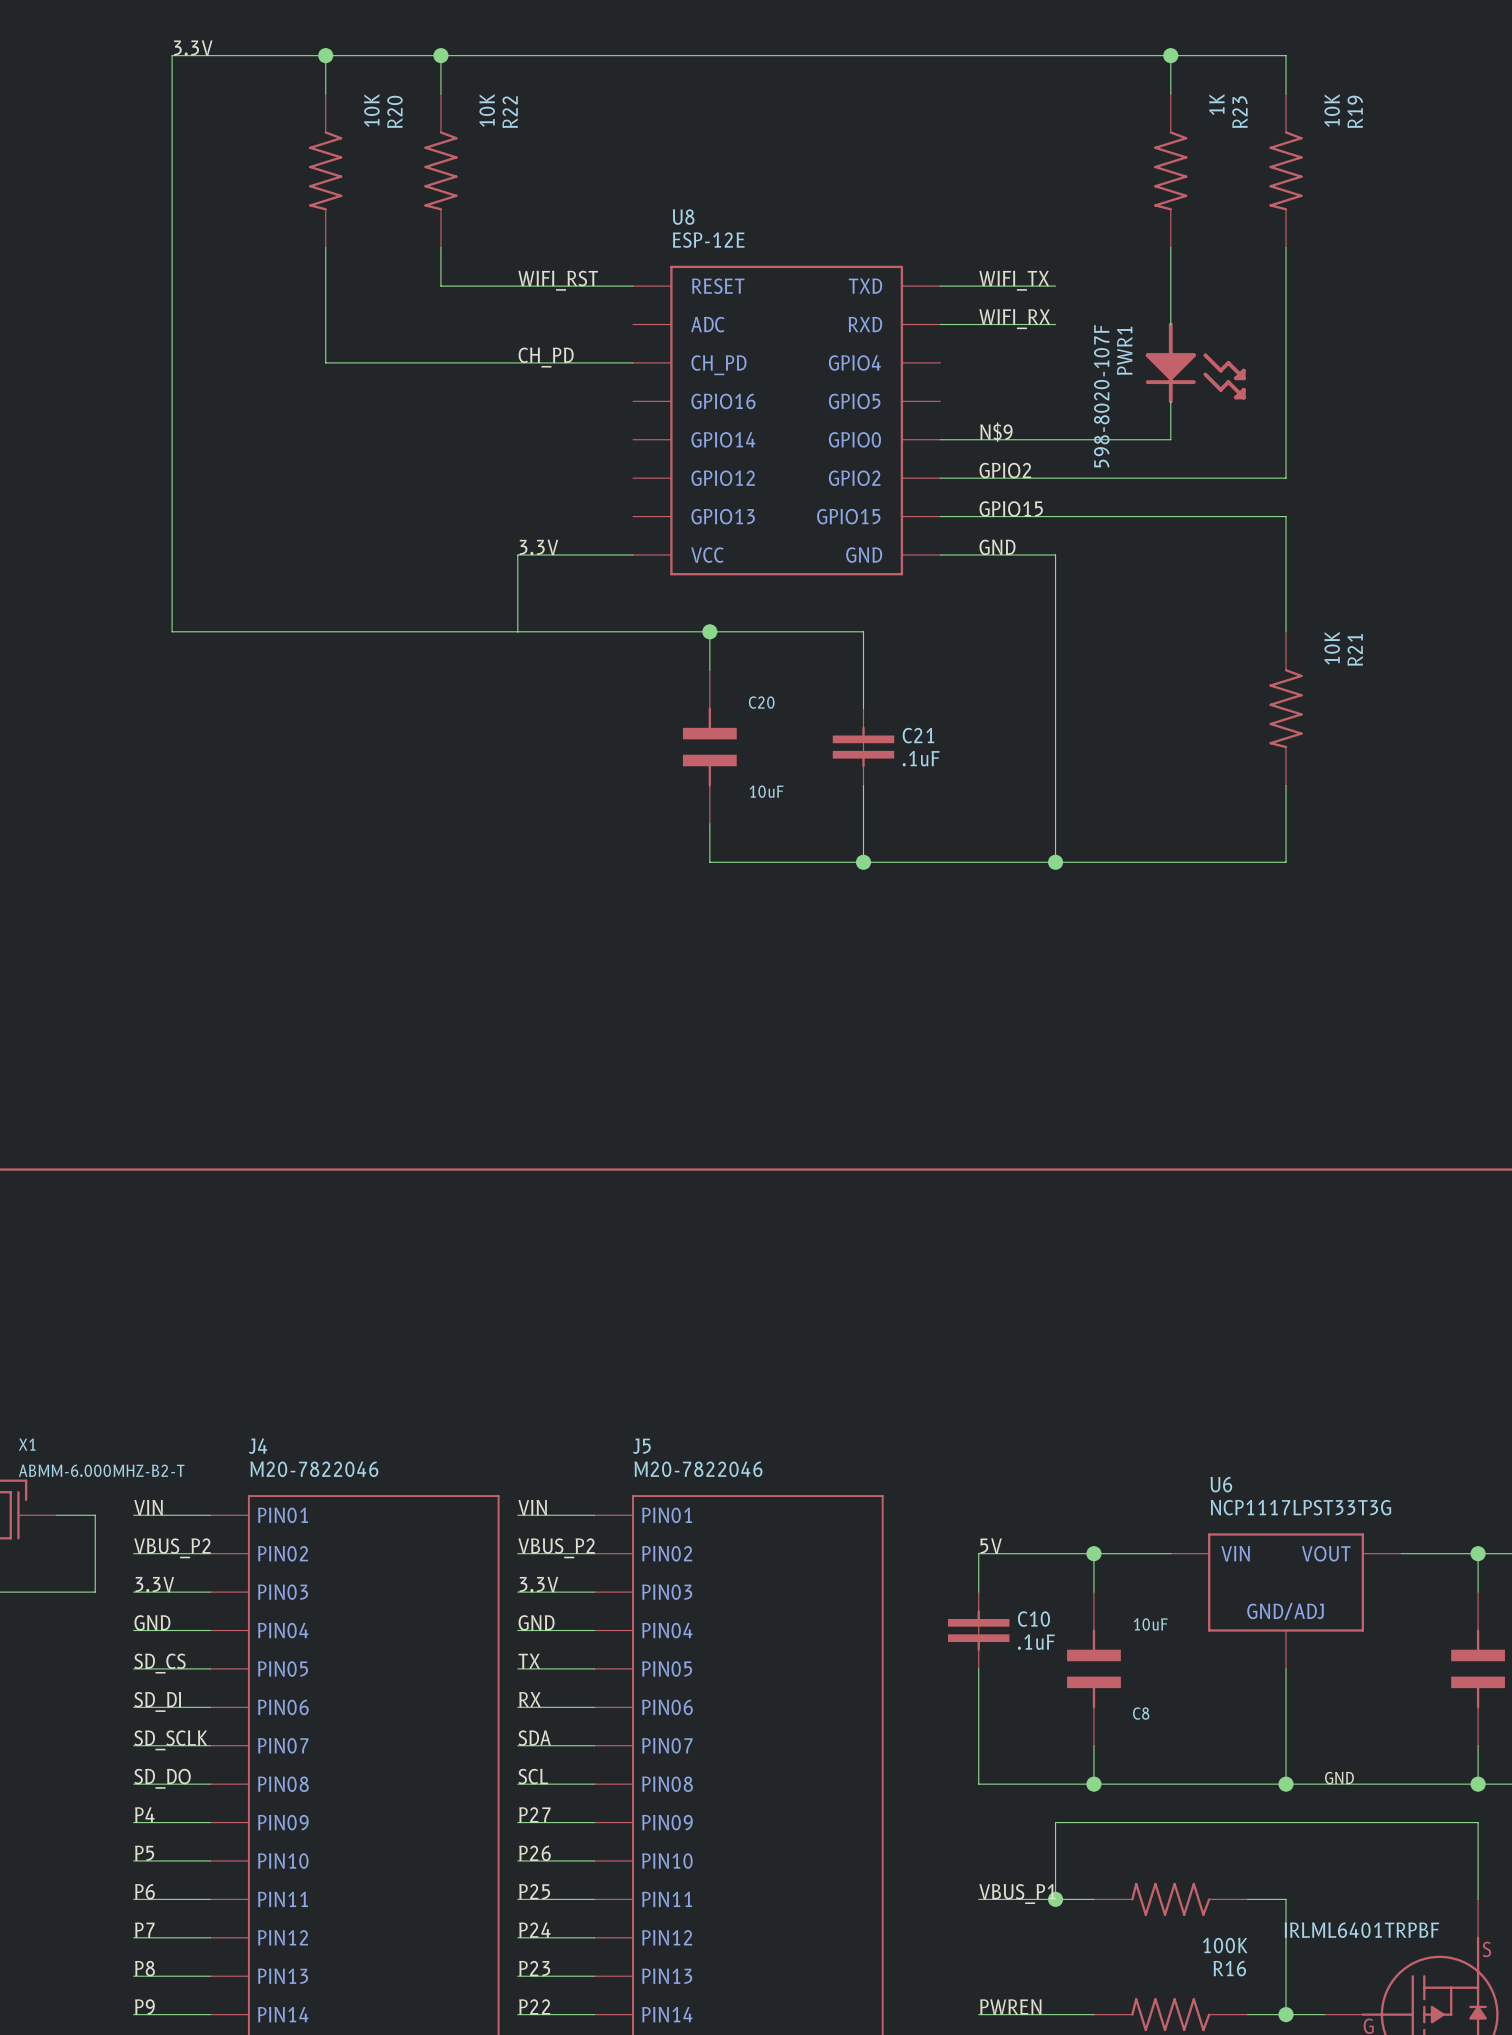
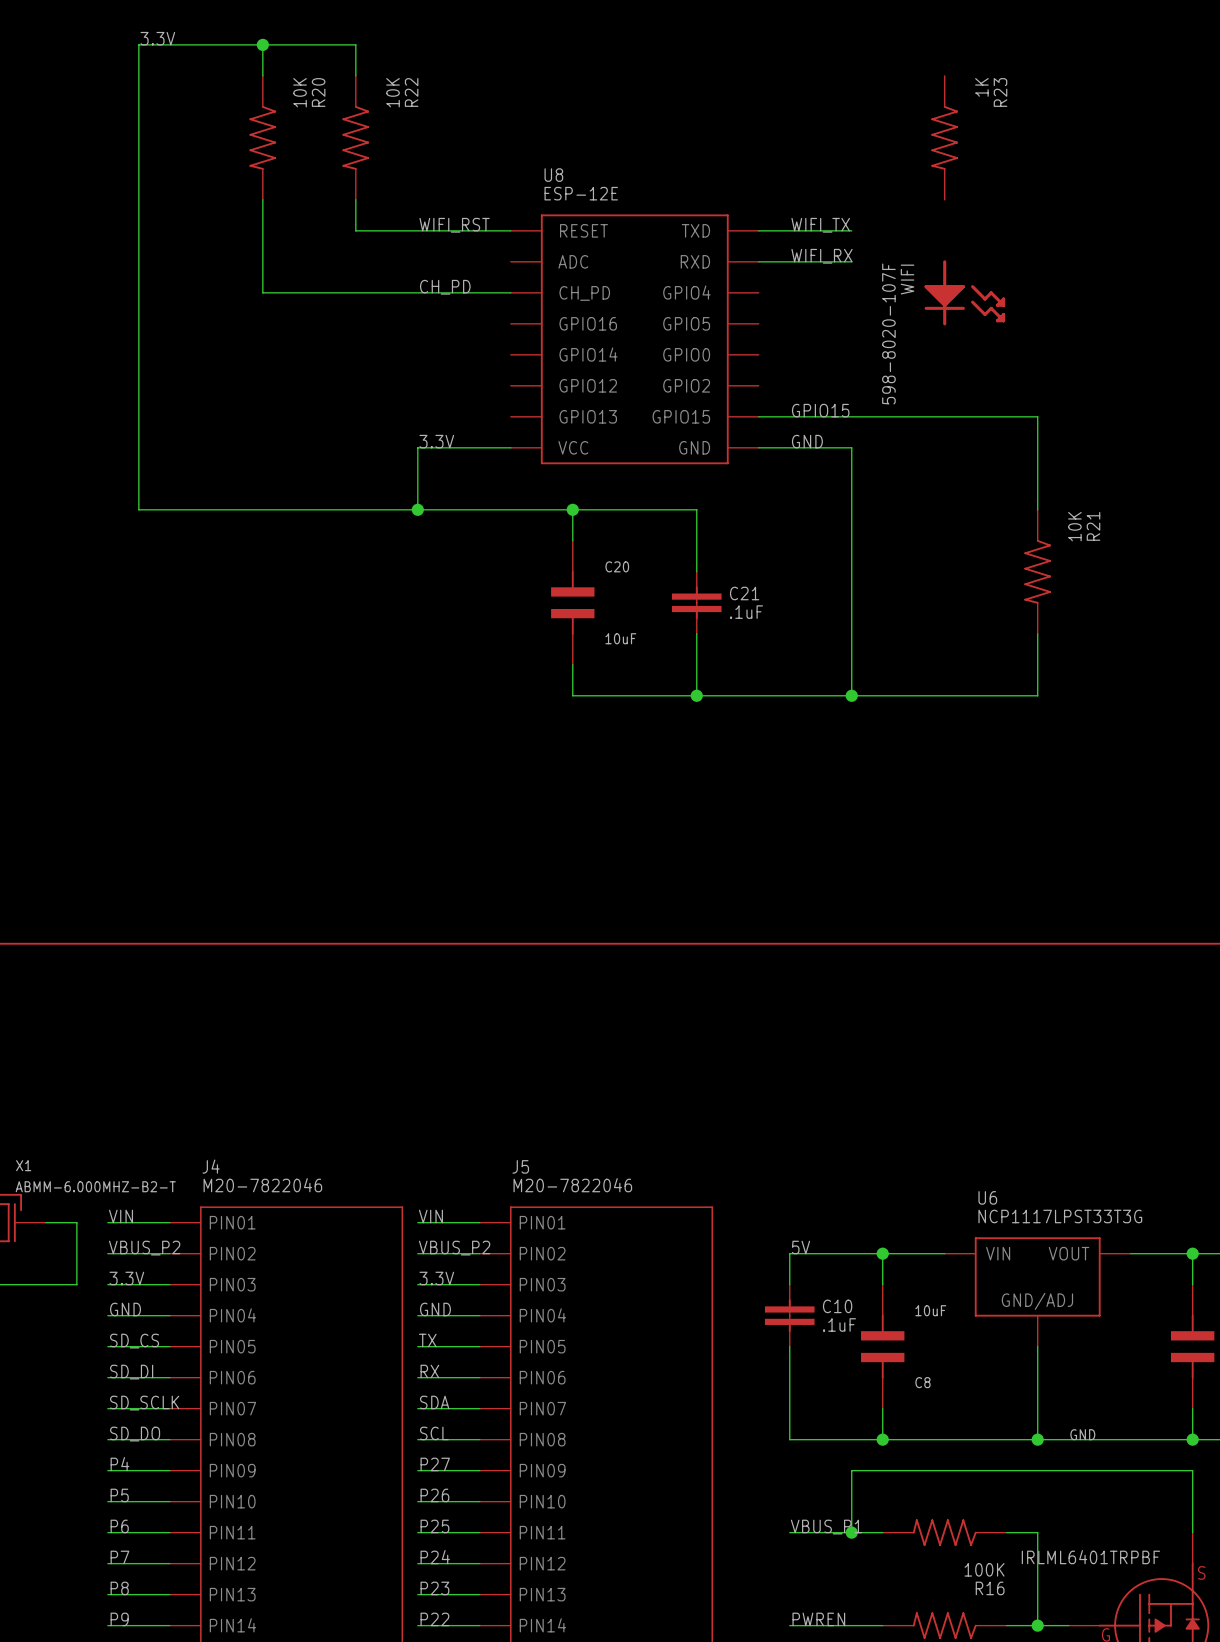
wire: (440, 55) (1286, 55) (1286, 94) -> none
junction: (440, 55) -> none
wire: (1170, 55) (1170, 94) -> none
junction: (1170, 55) -> none
R19: 10K (1286, 170) -> none
wire: (1170, 247) (1170, 324) -> none
wire: (1286, 247) (1286, 478) (940, 478) -> none
PWR1 name: PWR1 (1124, 350) -> WIFI (907, 279)
wire: (1170, 401) (1170, 439) (940, 439) -> none
label: N$9 (996, 432) -> none
label: GPIO2 (1005, 470) -> none
junction: none -> (417, 509)

